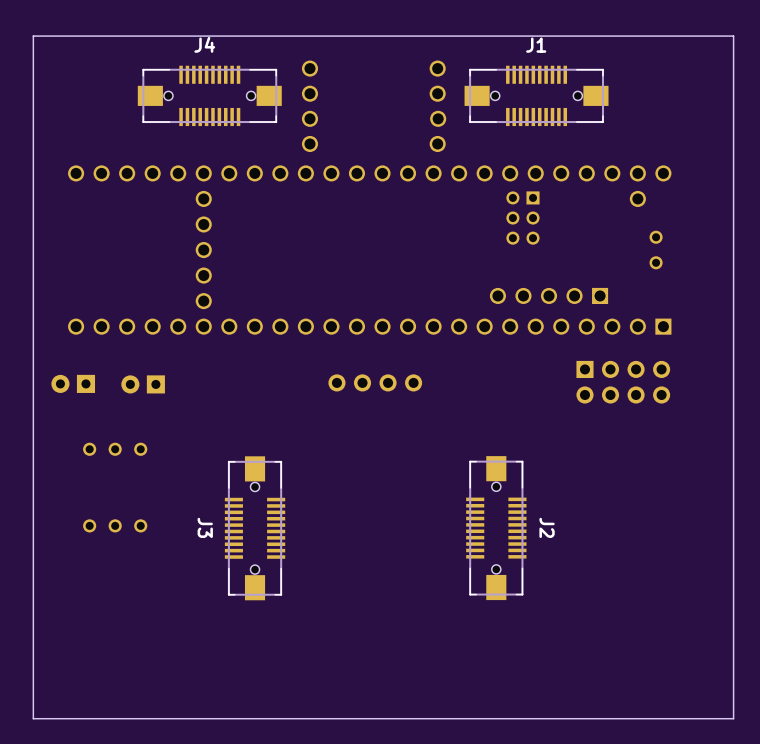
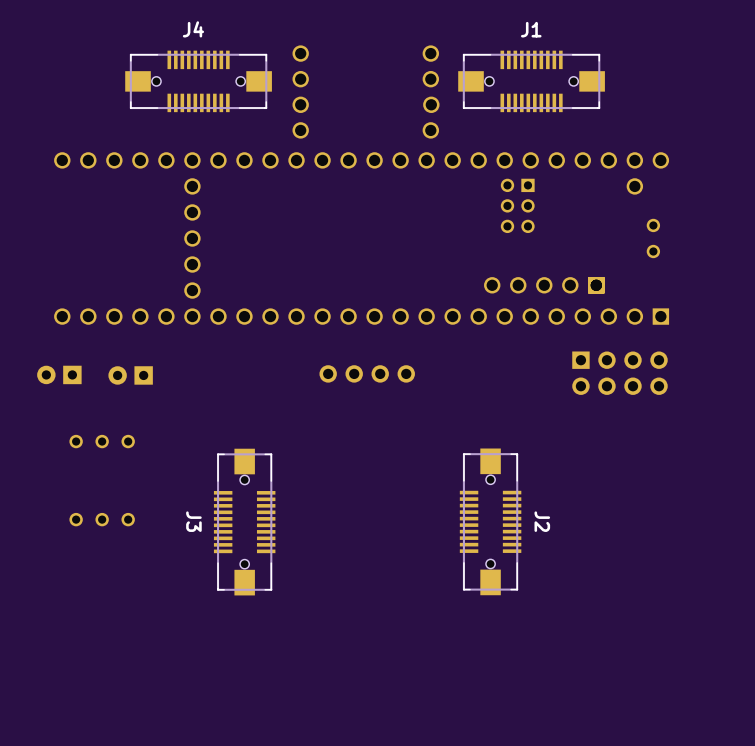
board edge: (733, 36) (33, 36) (33, 718) (733, 718) (733, 36) -> none
part: none -> (596, 285)

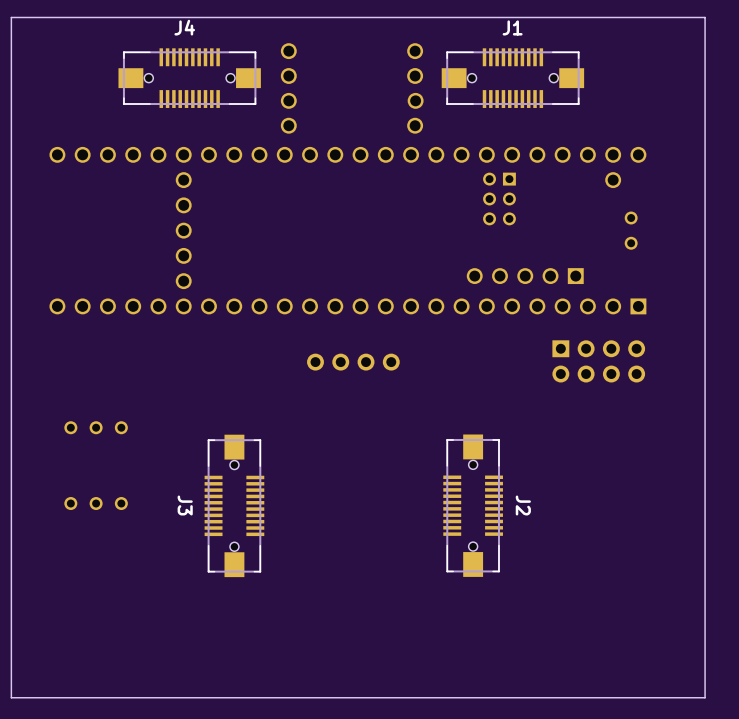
board edge: none -> (705, 17) (11, 17) (11, 697) (705, 697) (705, 17)
part: (596, 285) -> none
part: (59, 374) -> none
part: (130, 375) -> none

